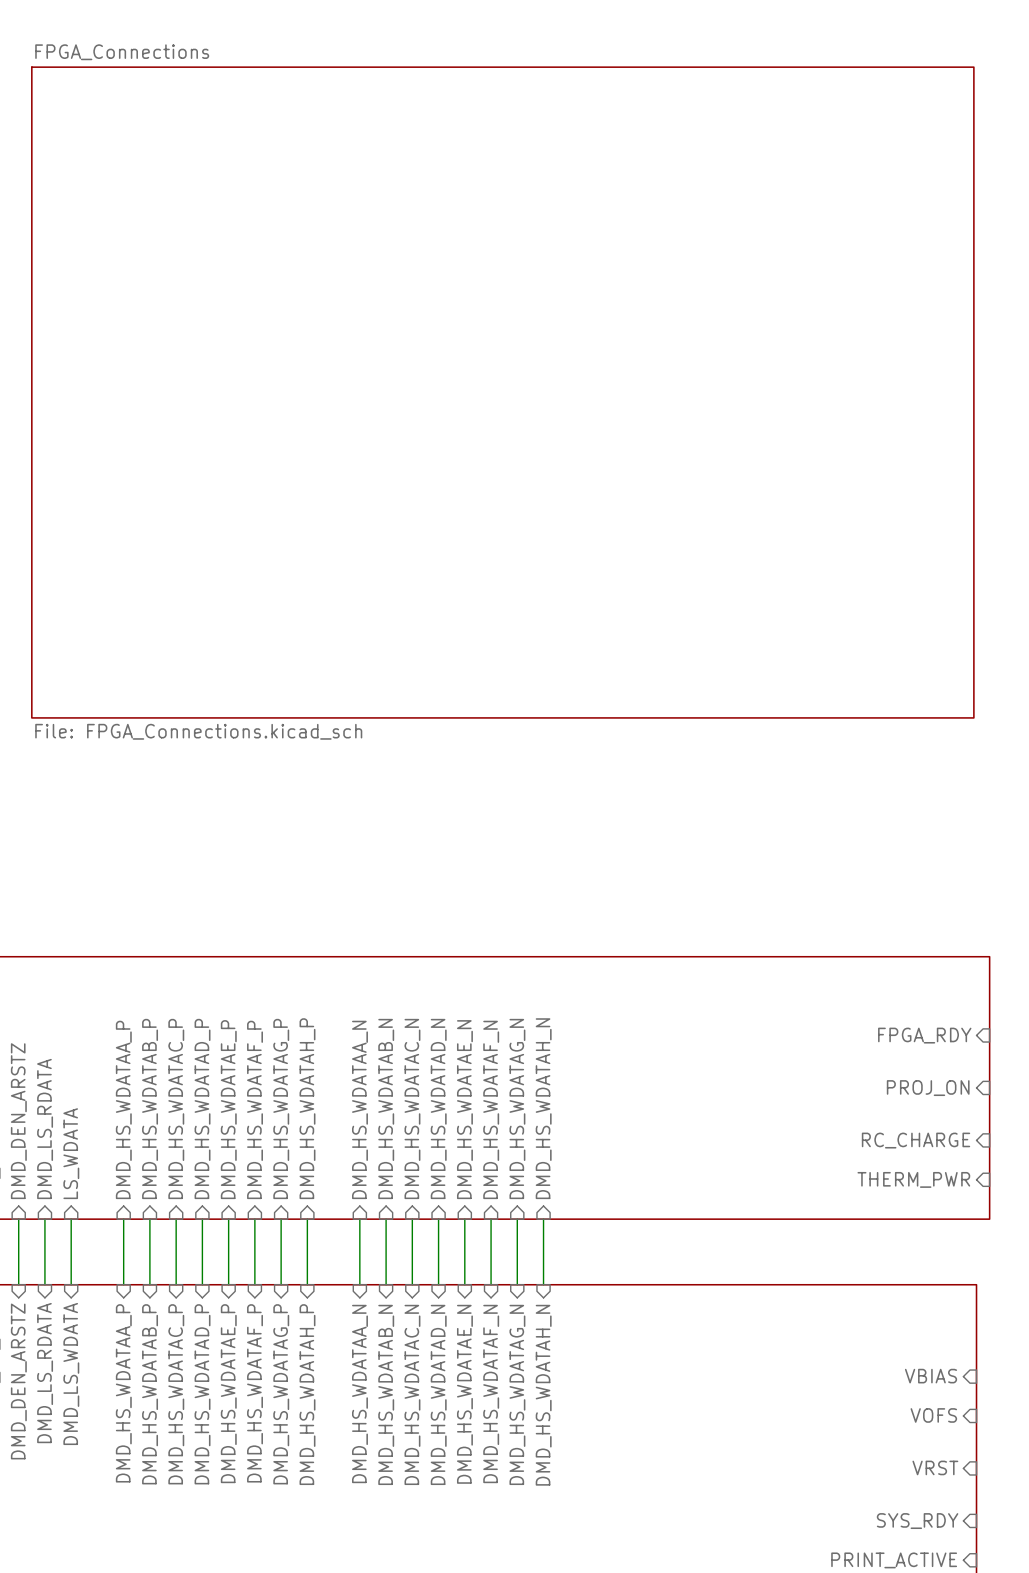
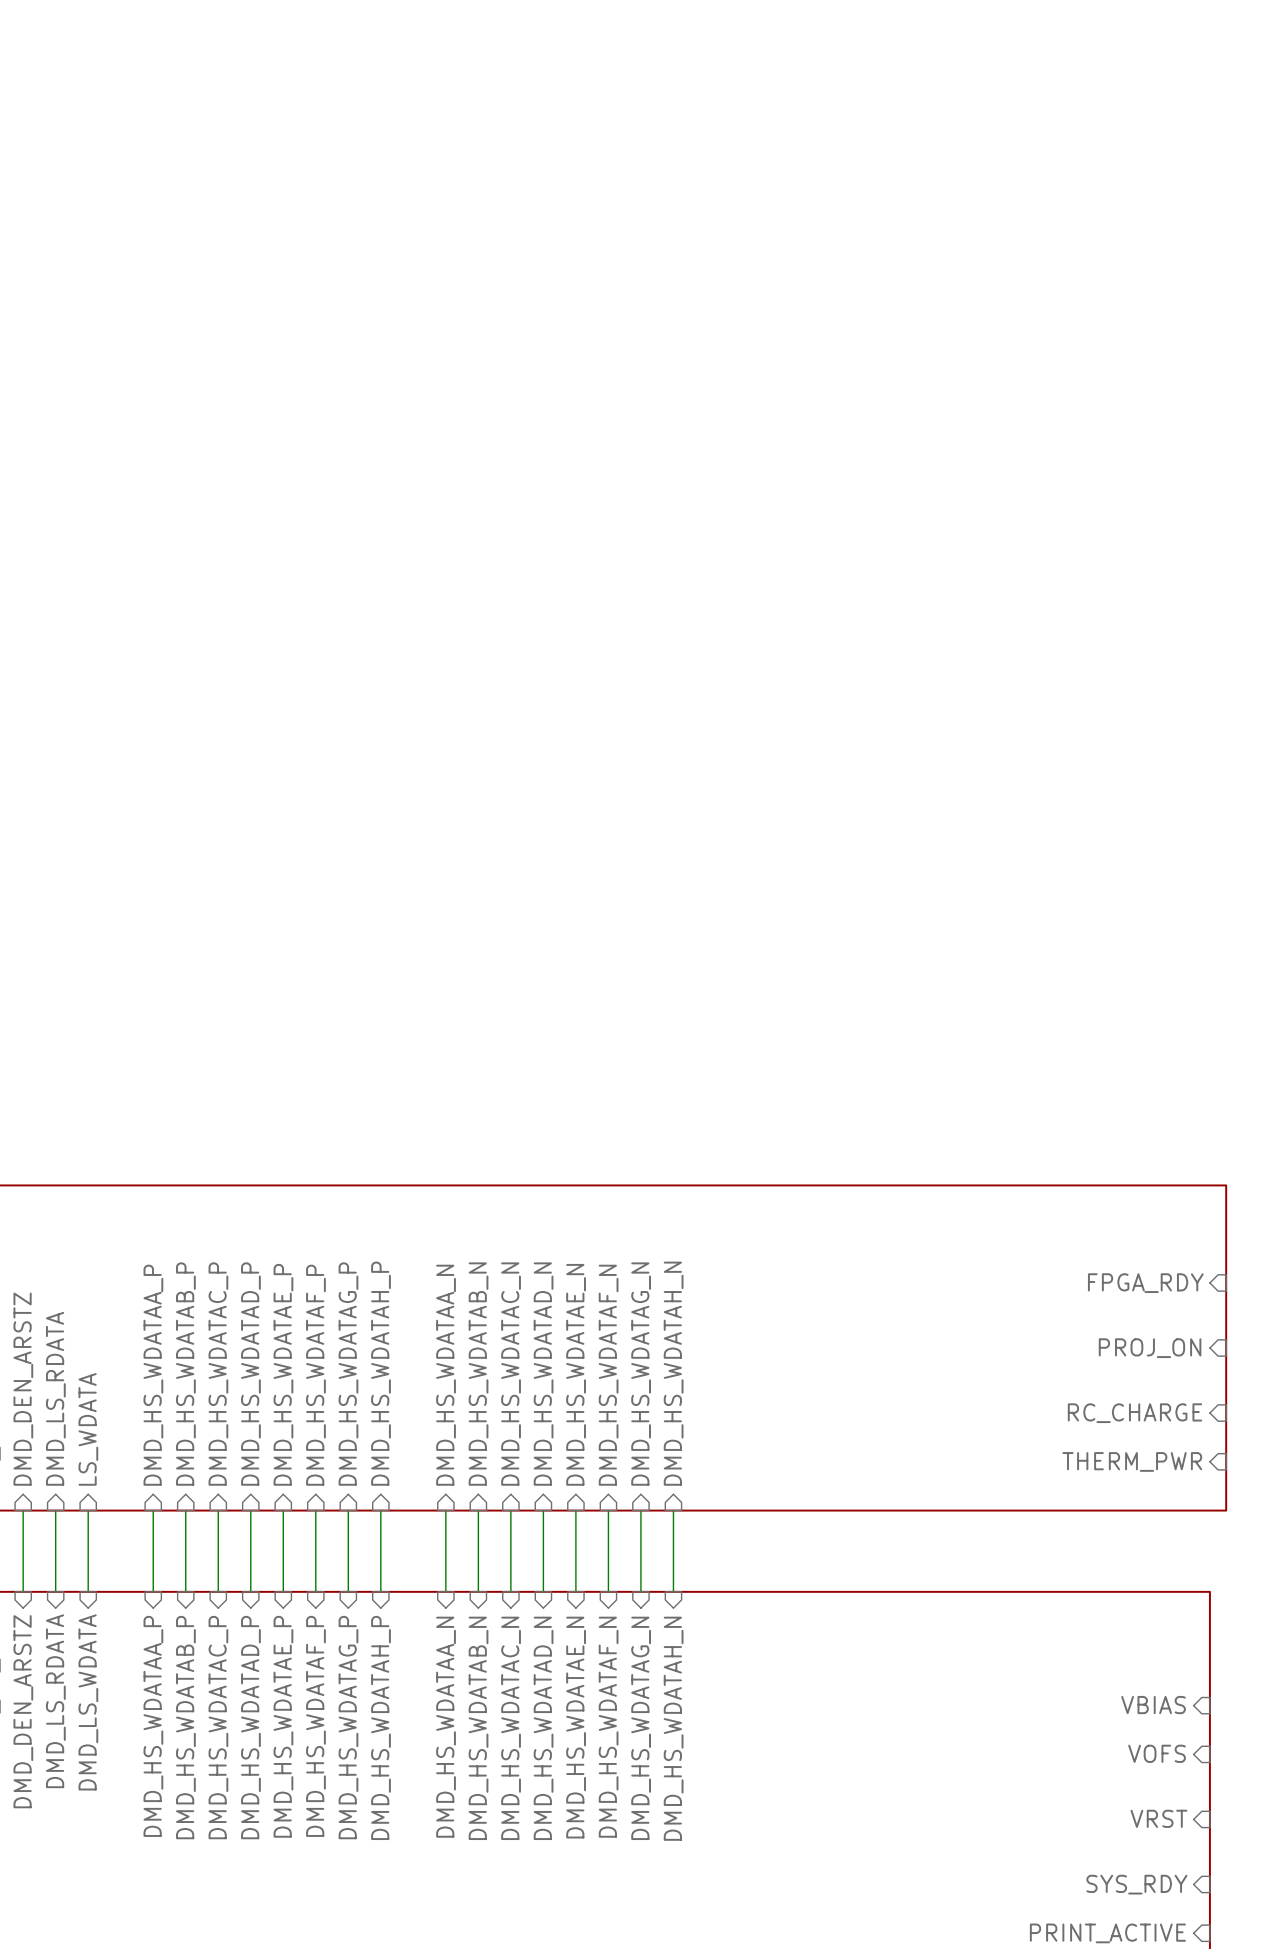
sheet FPGA_Connections: File: FPGA_Connections.kicad_sch (502, 392) -> none

